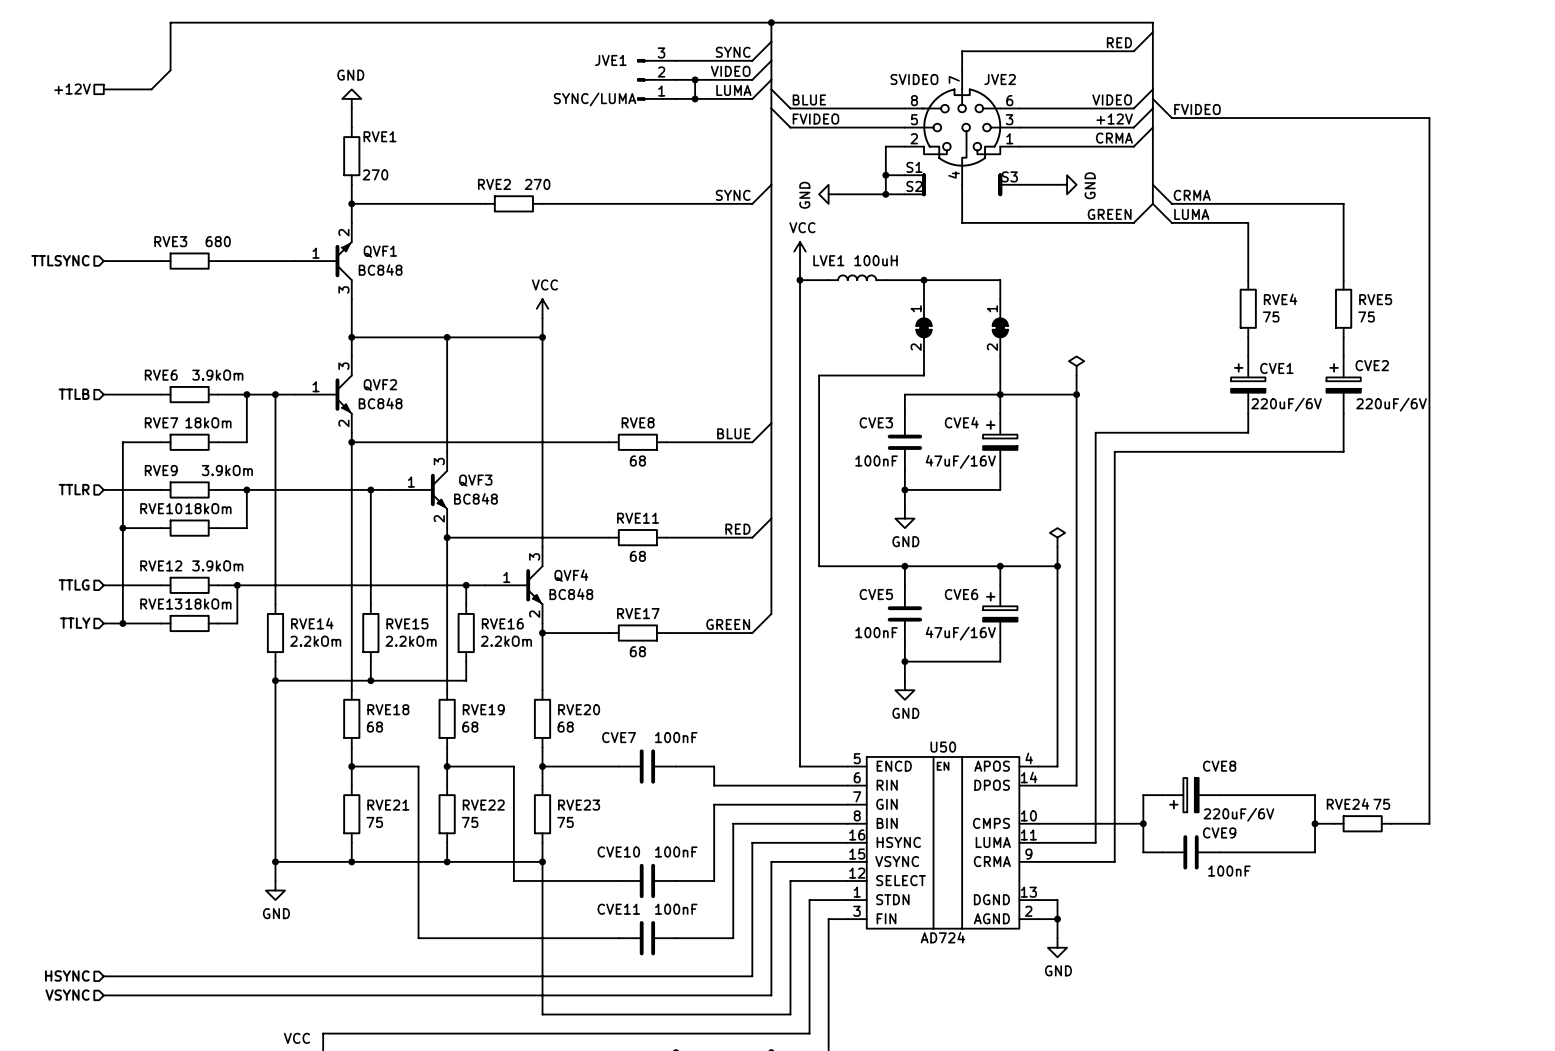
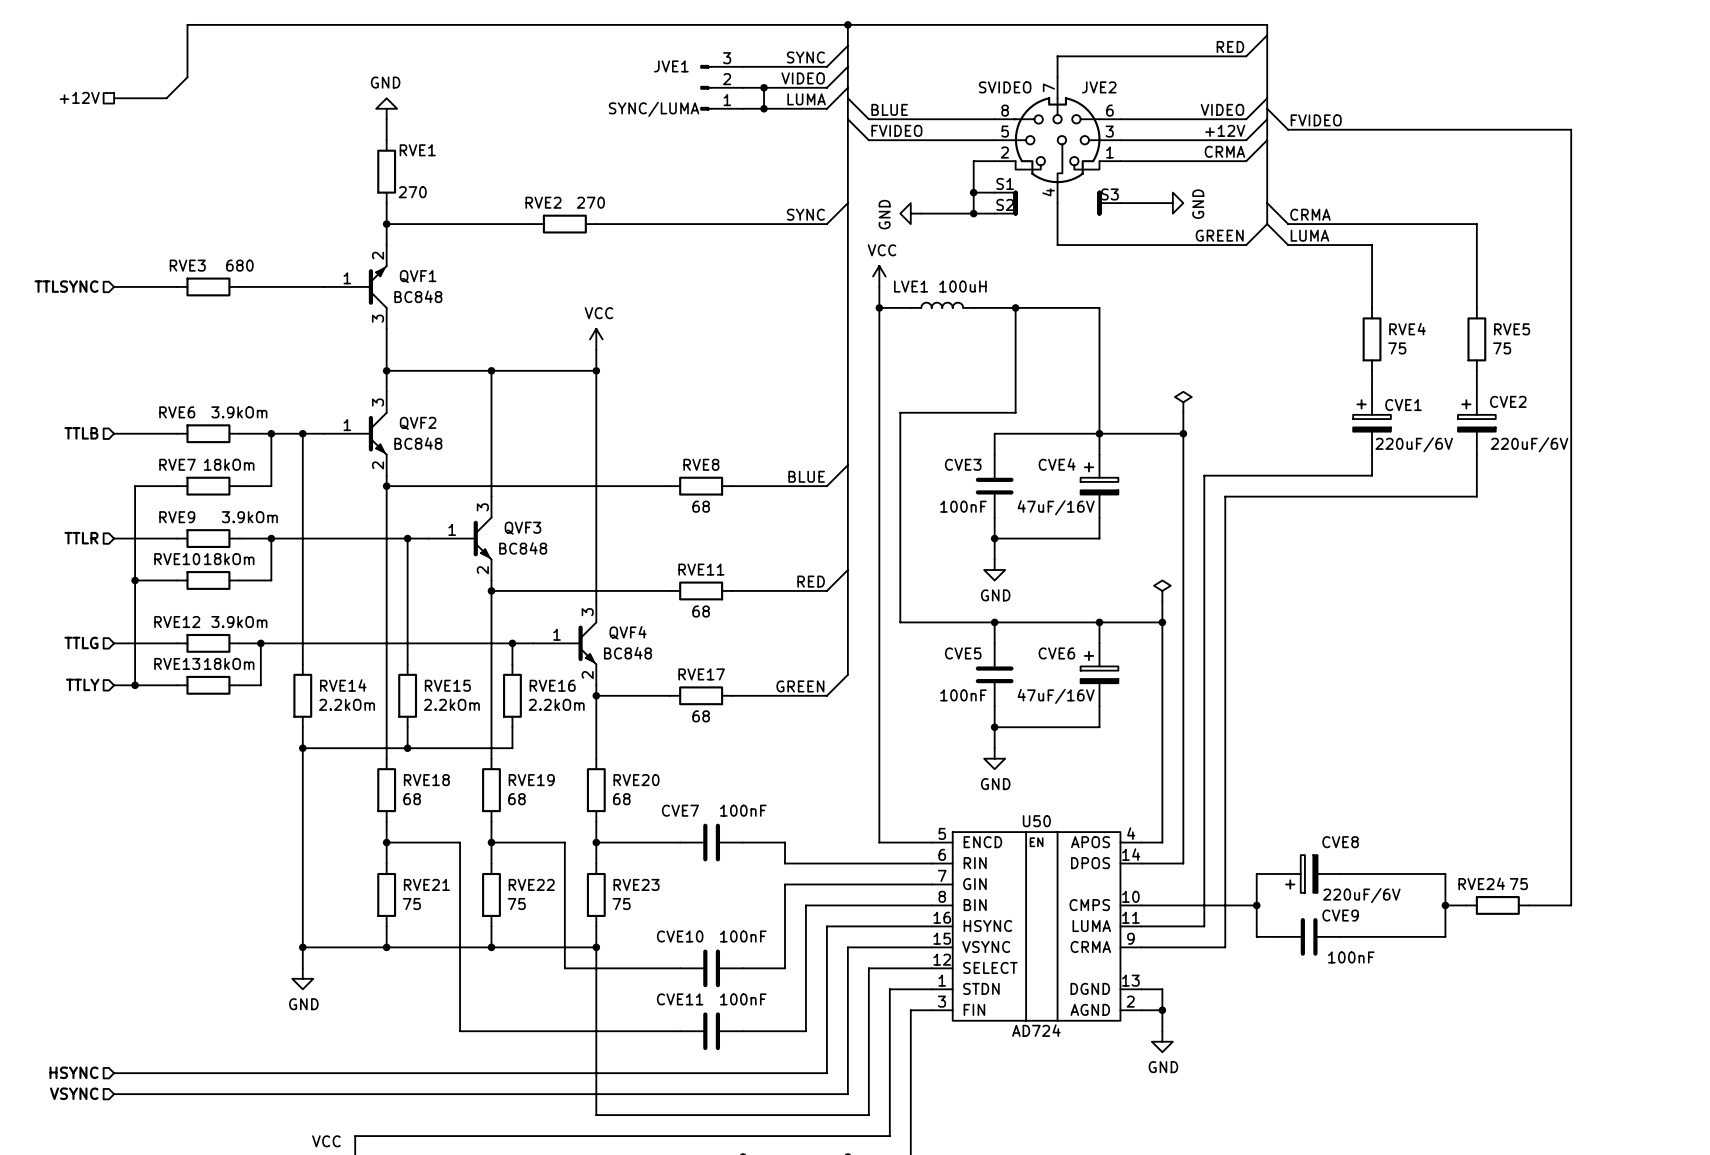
part: (923, 327) -> none
part: (1000, 327) -> none

